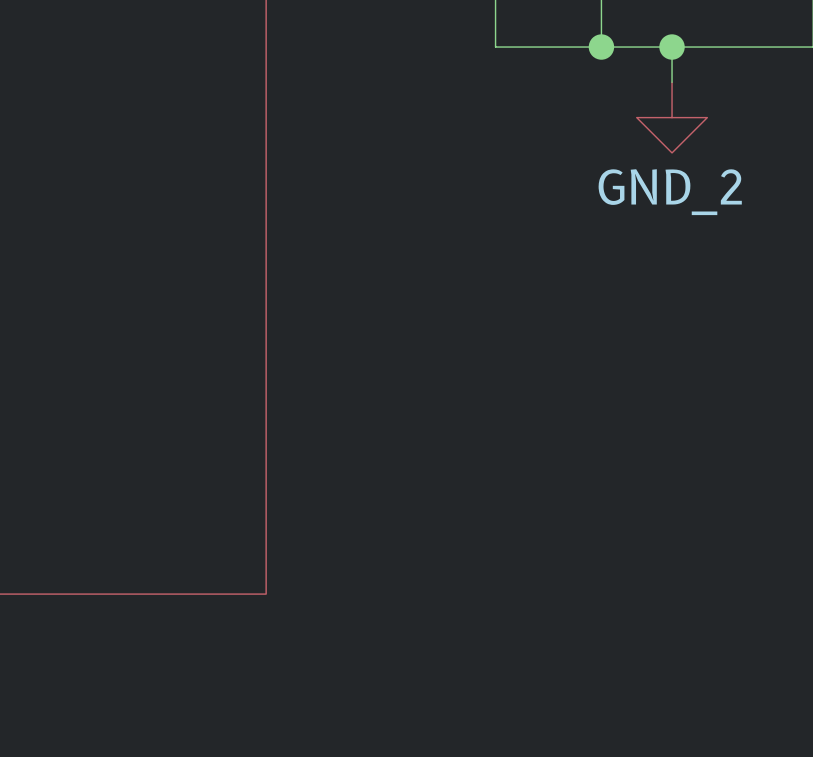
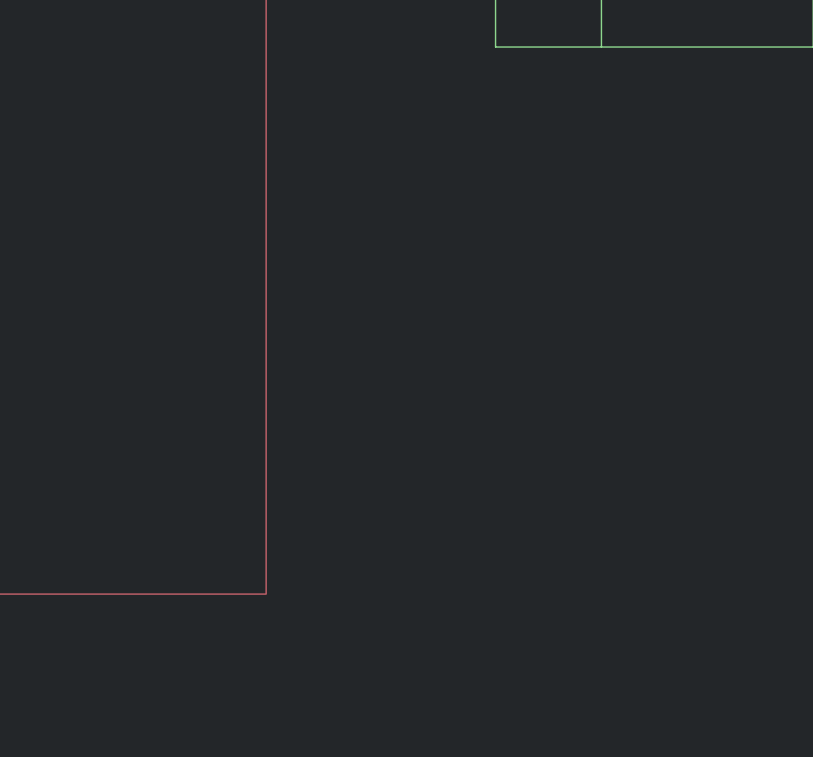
junction: (601, 47) -> none
wire: (672, 47) (672, 82) -> none
junction: (672, 47) -> none
power symbol: GND_2 (672, 117) -> none

